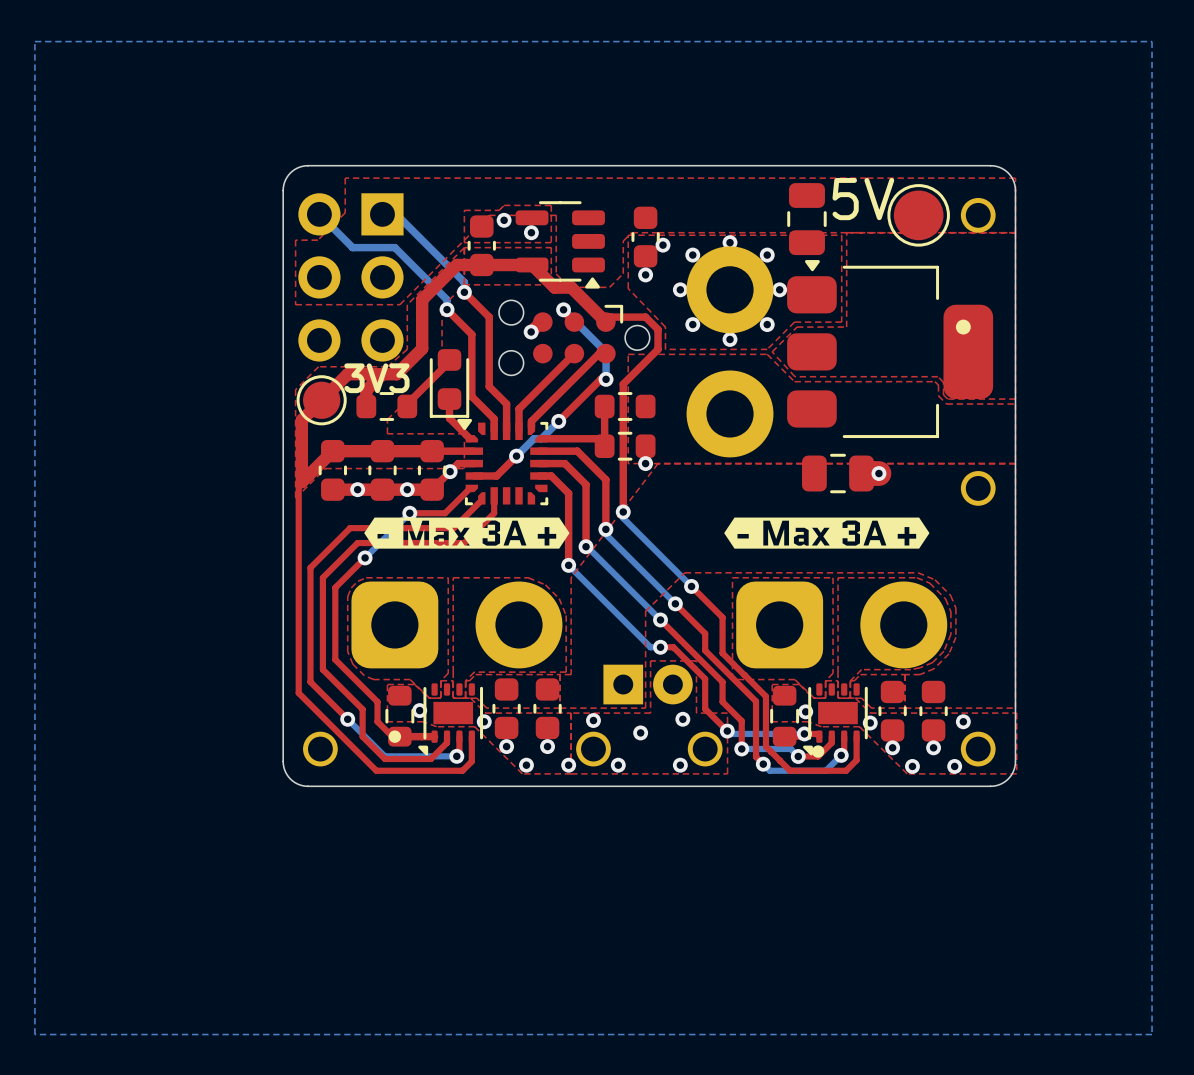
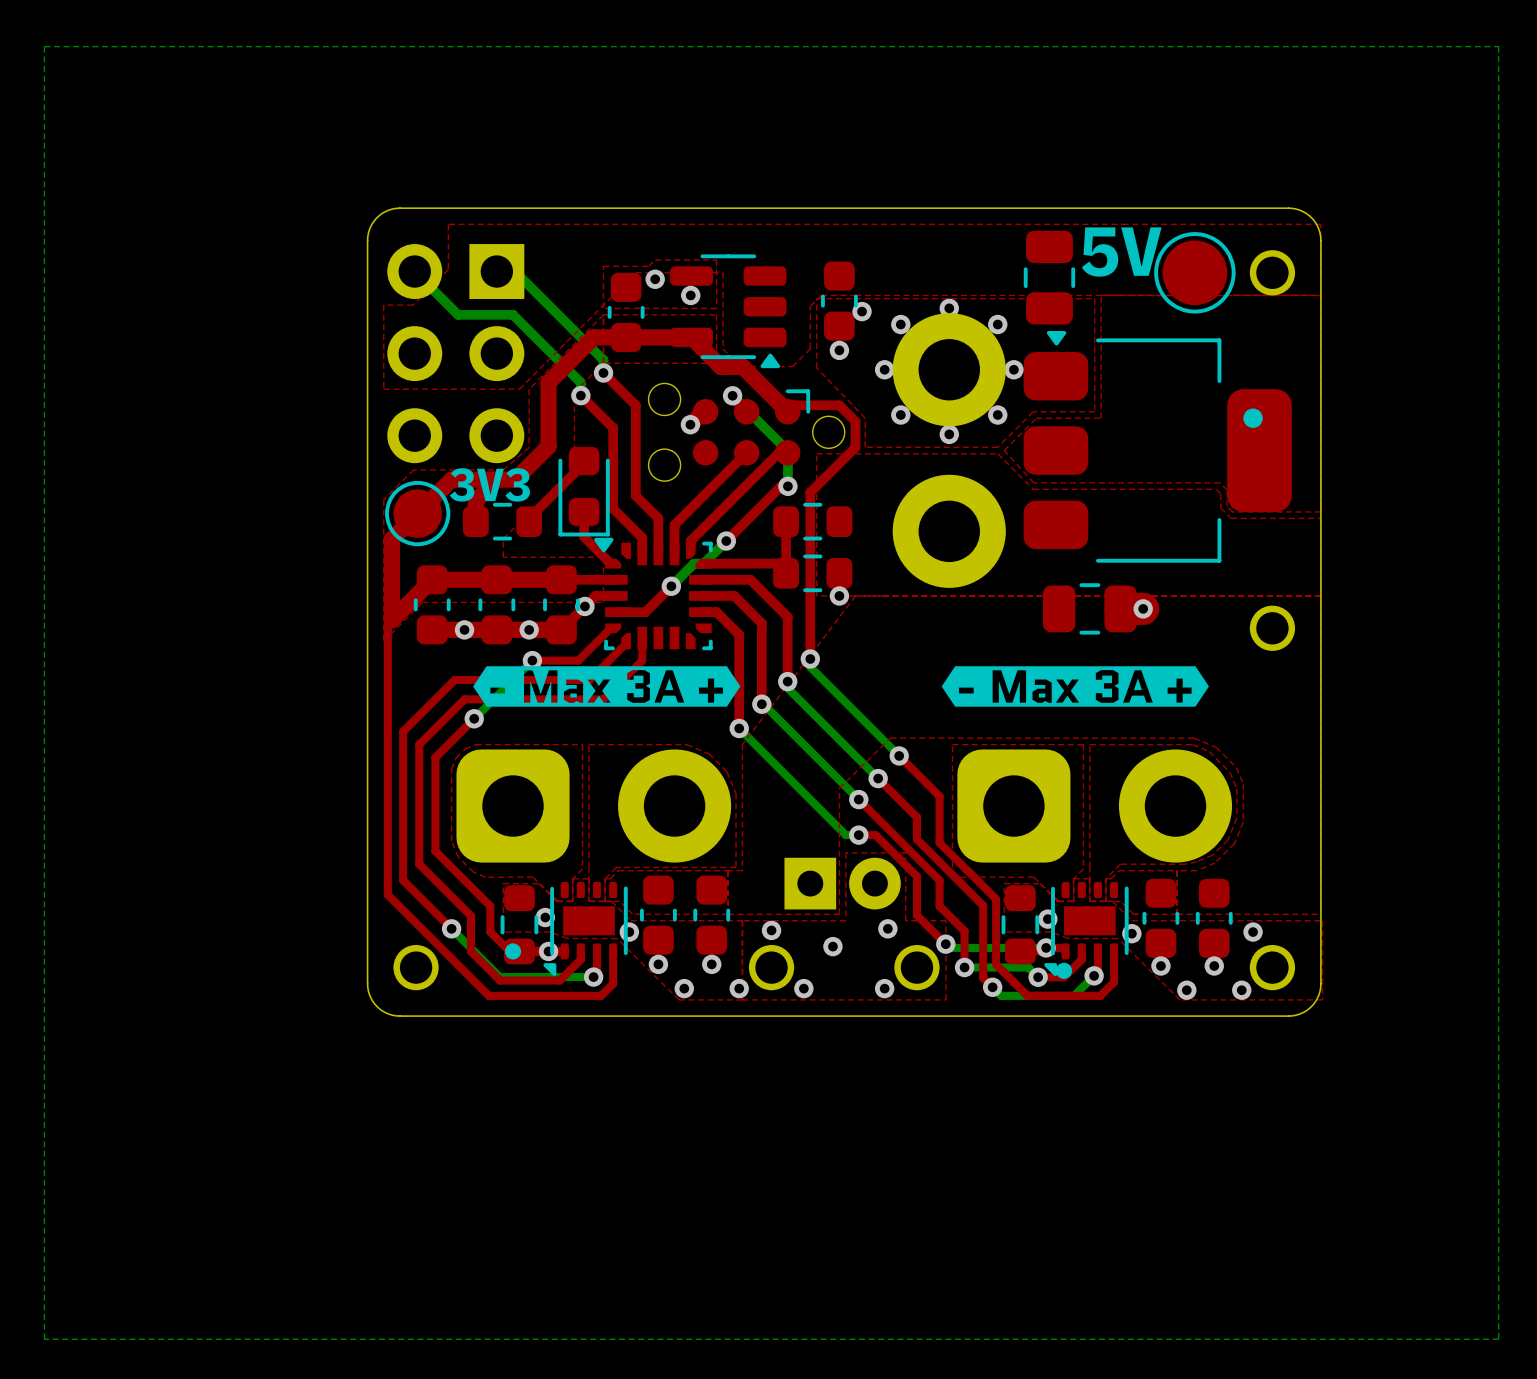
via: none -> (548, 951)

